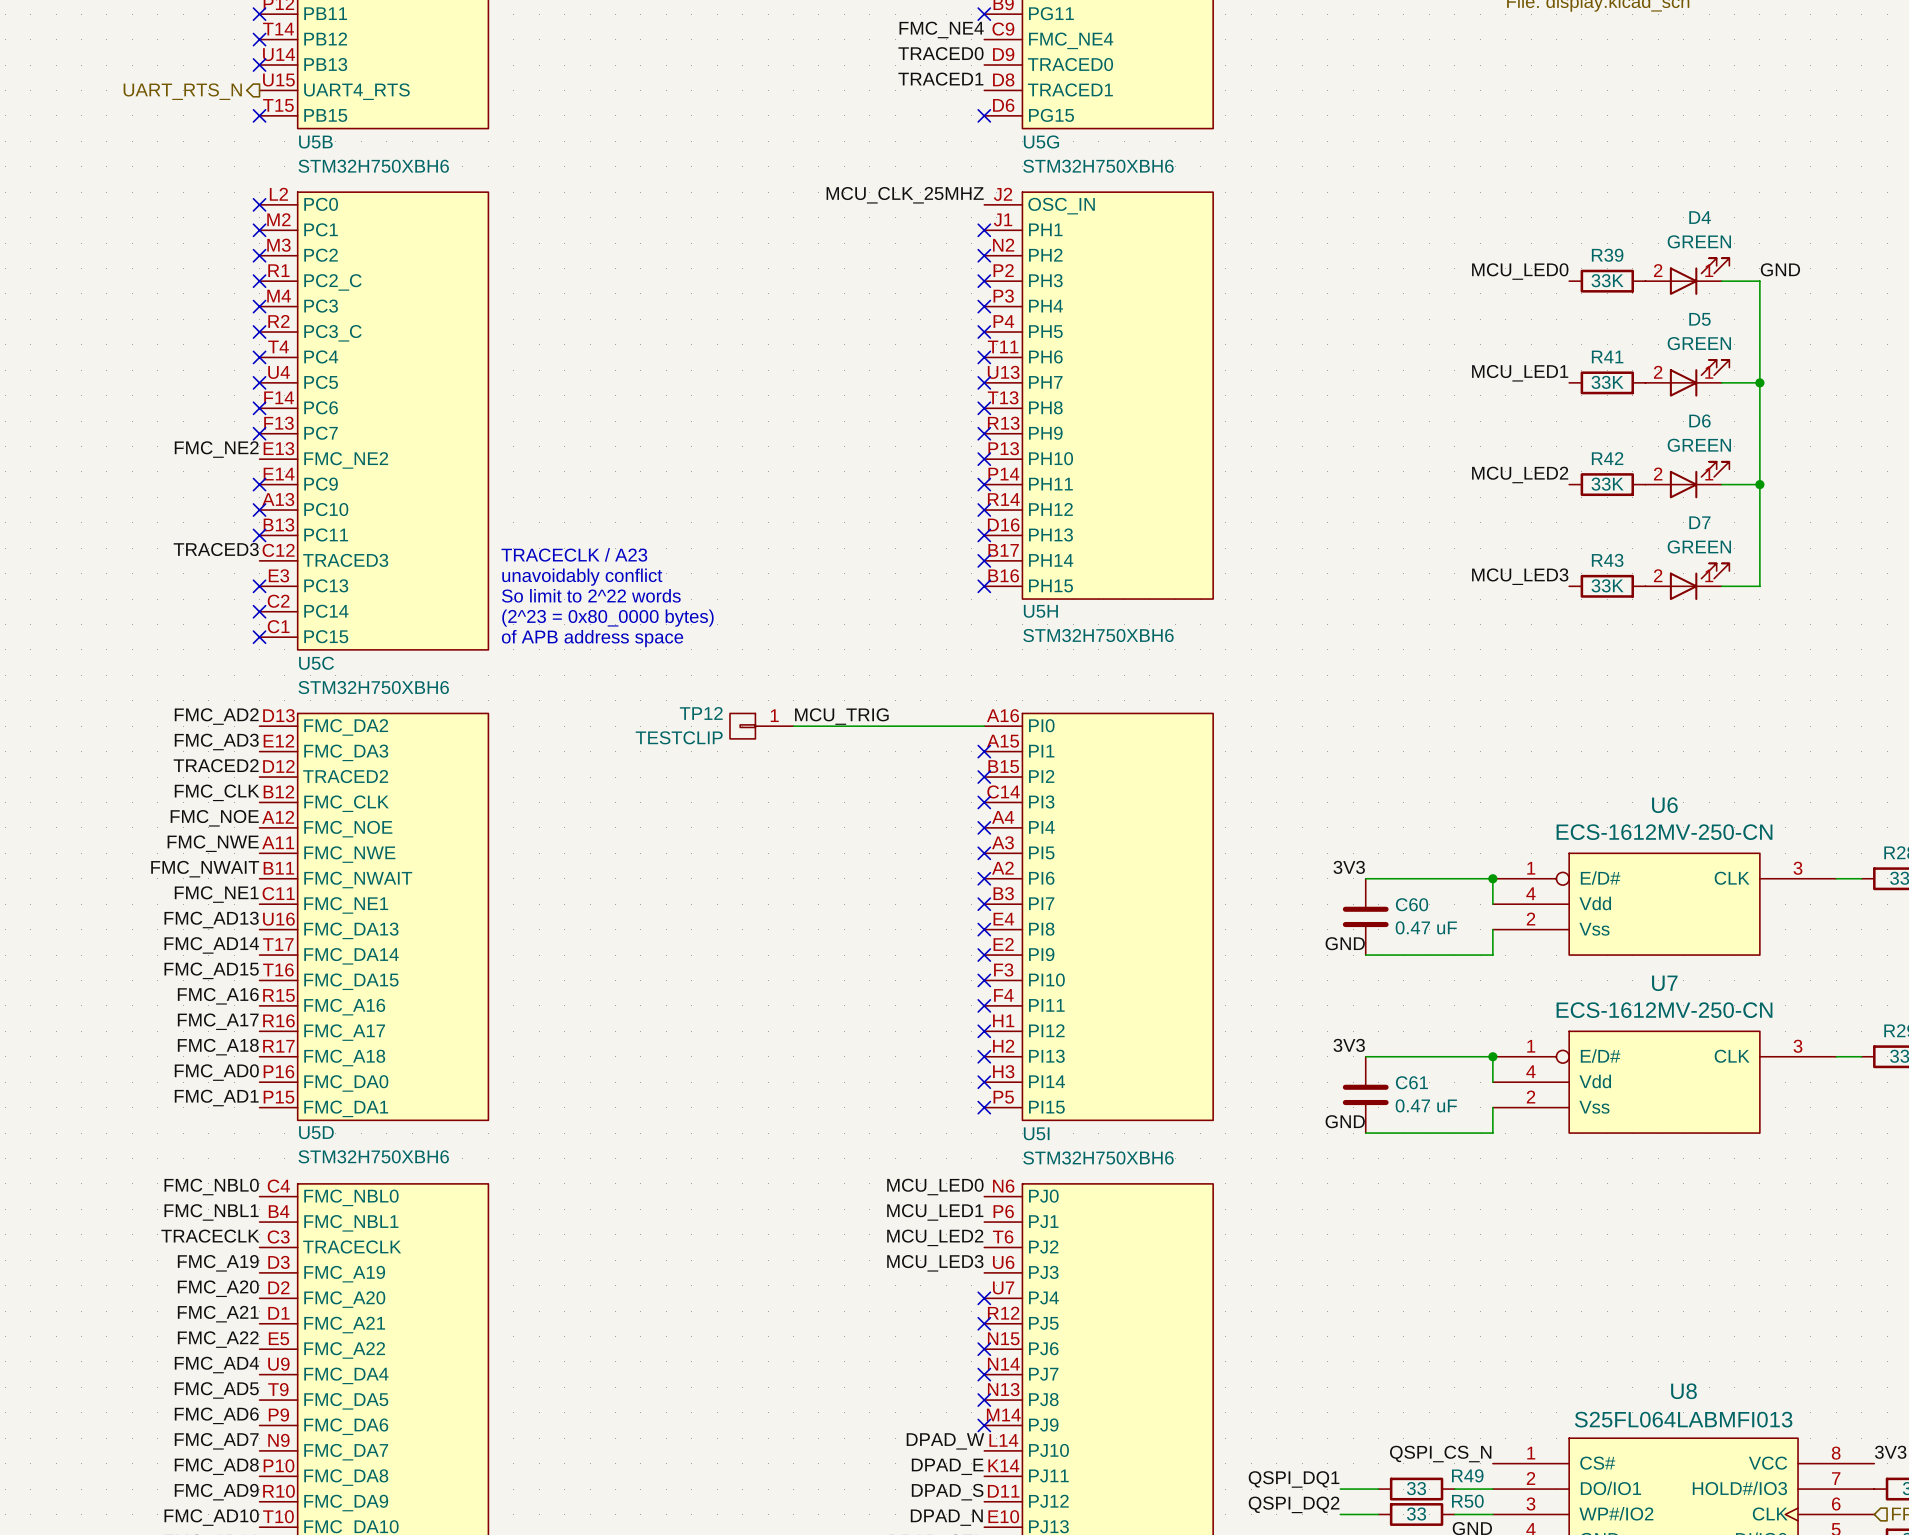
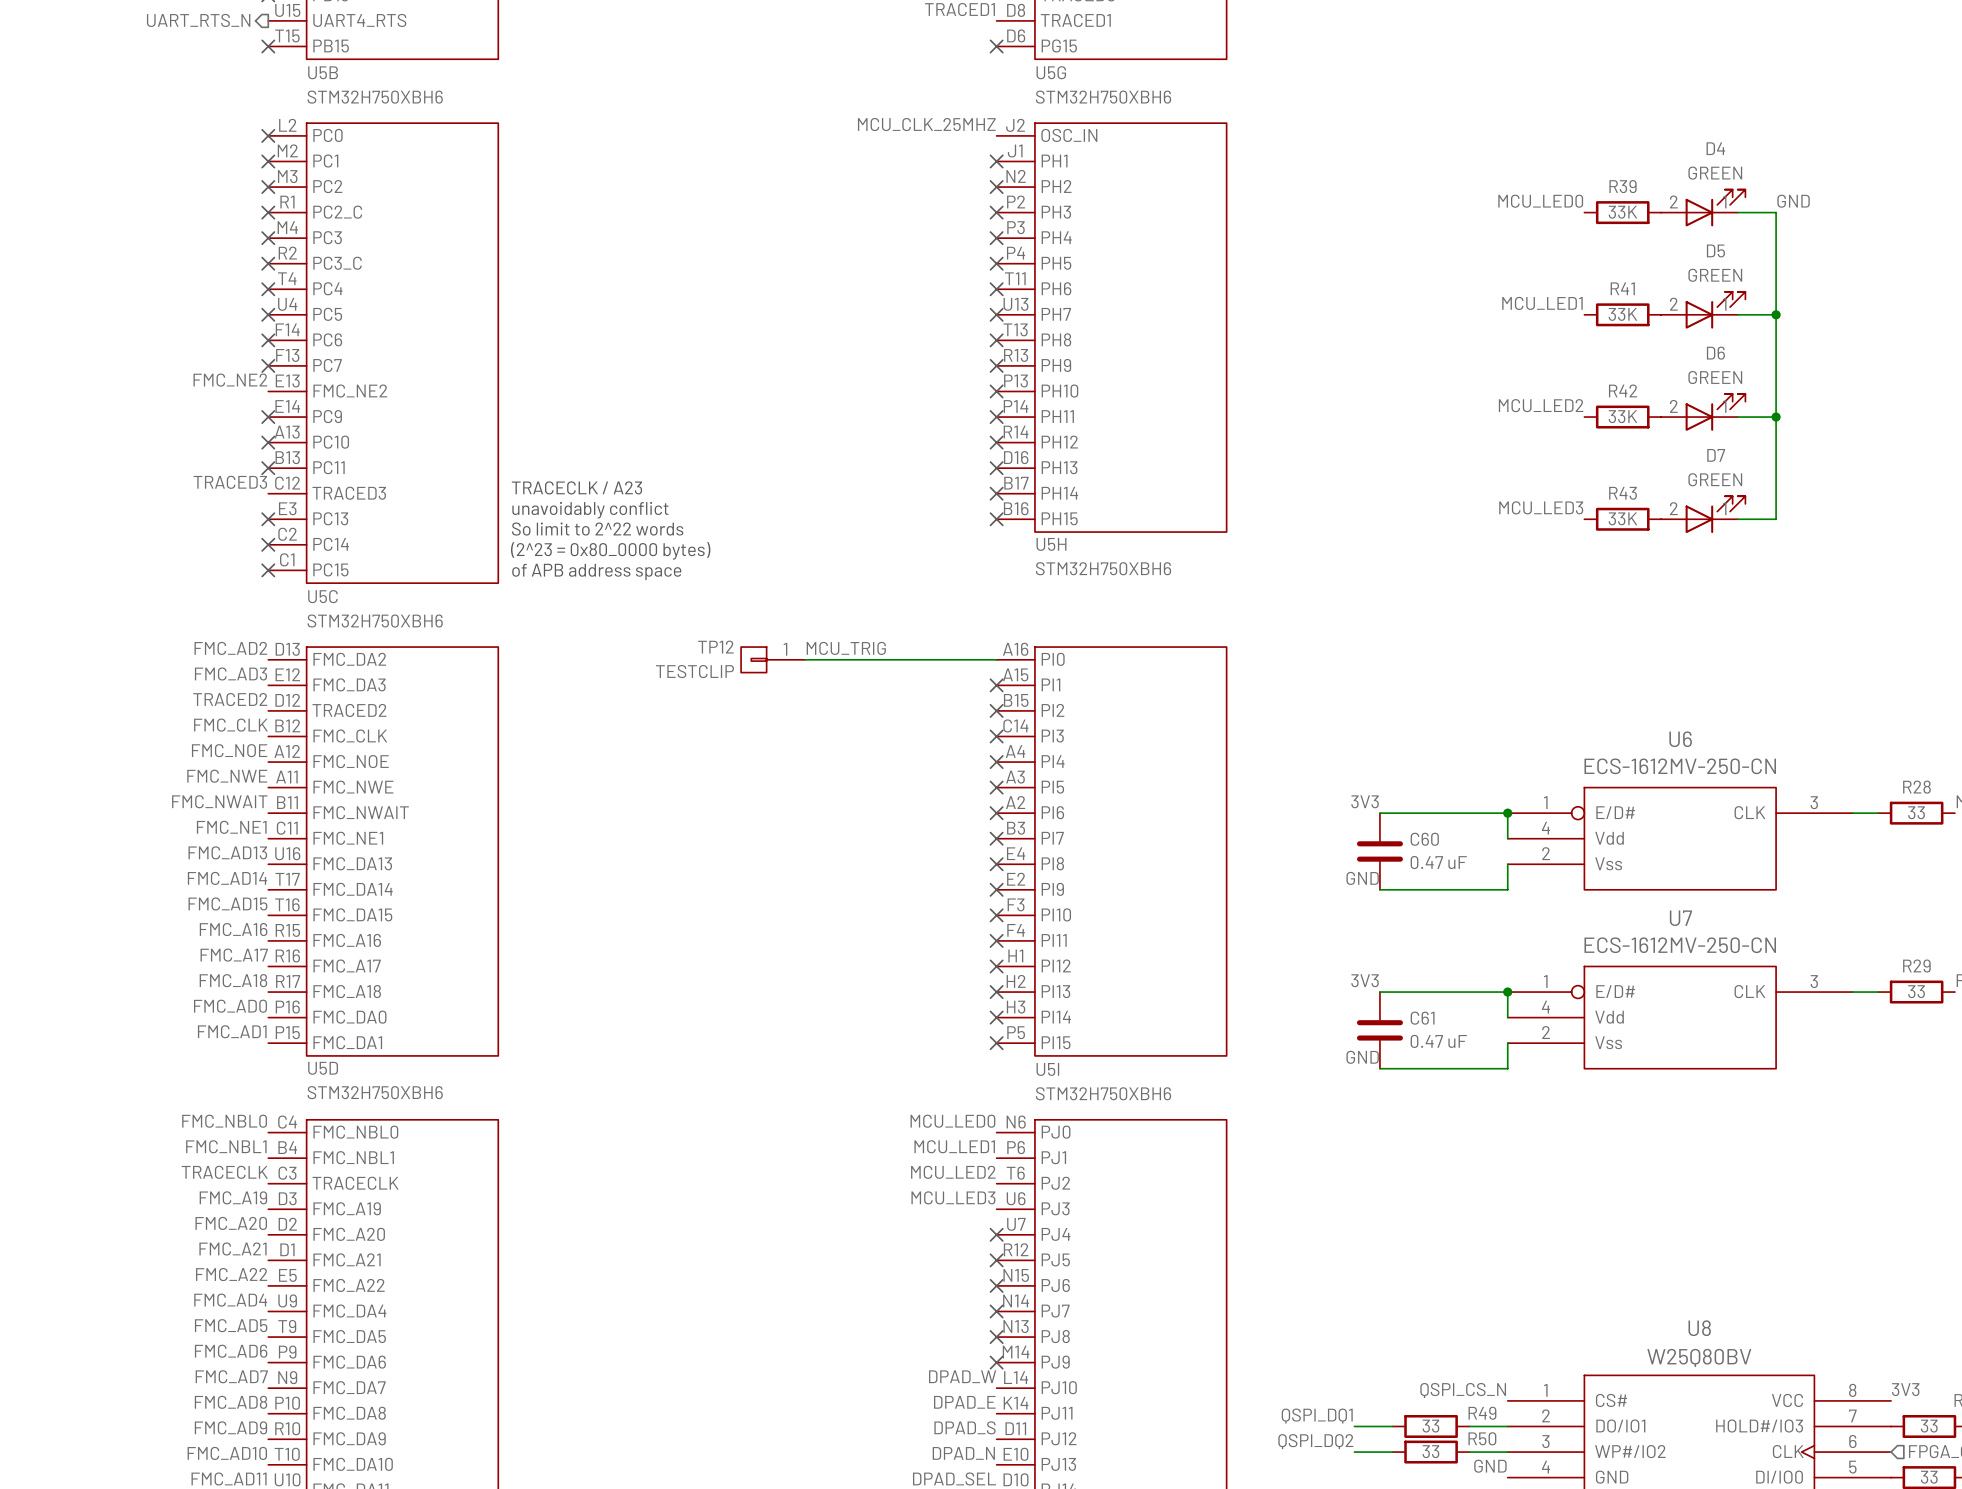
U8 value: S25FL064LABMFI013 (1683, 1419) -> W25Q80BV (1699, 1357)

